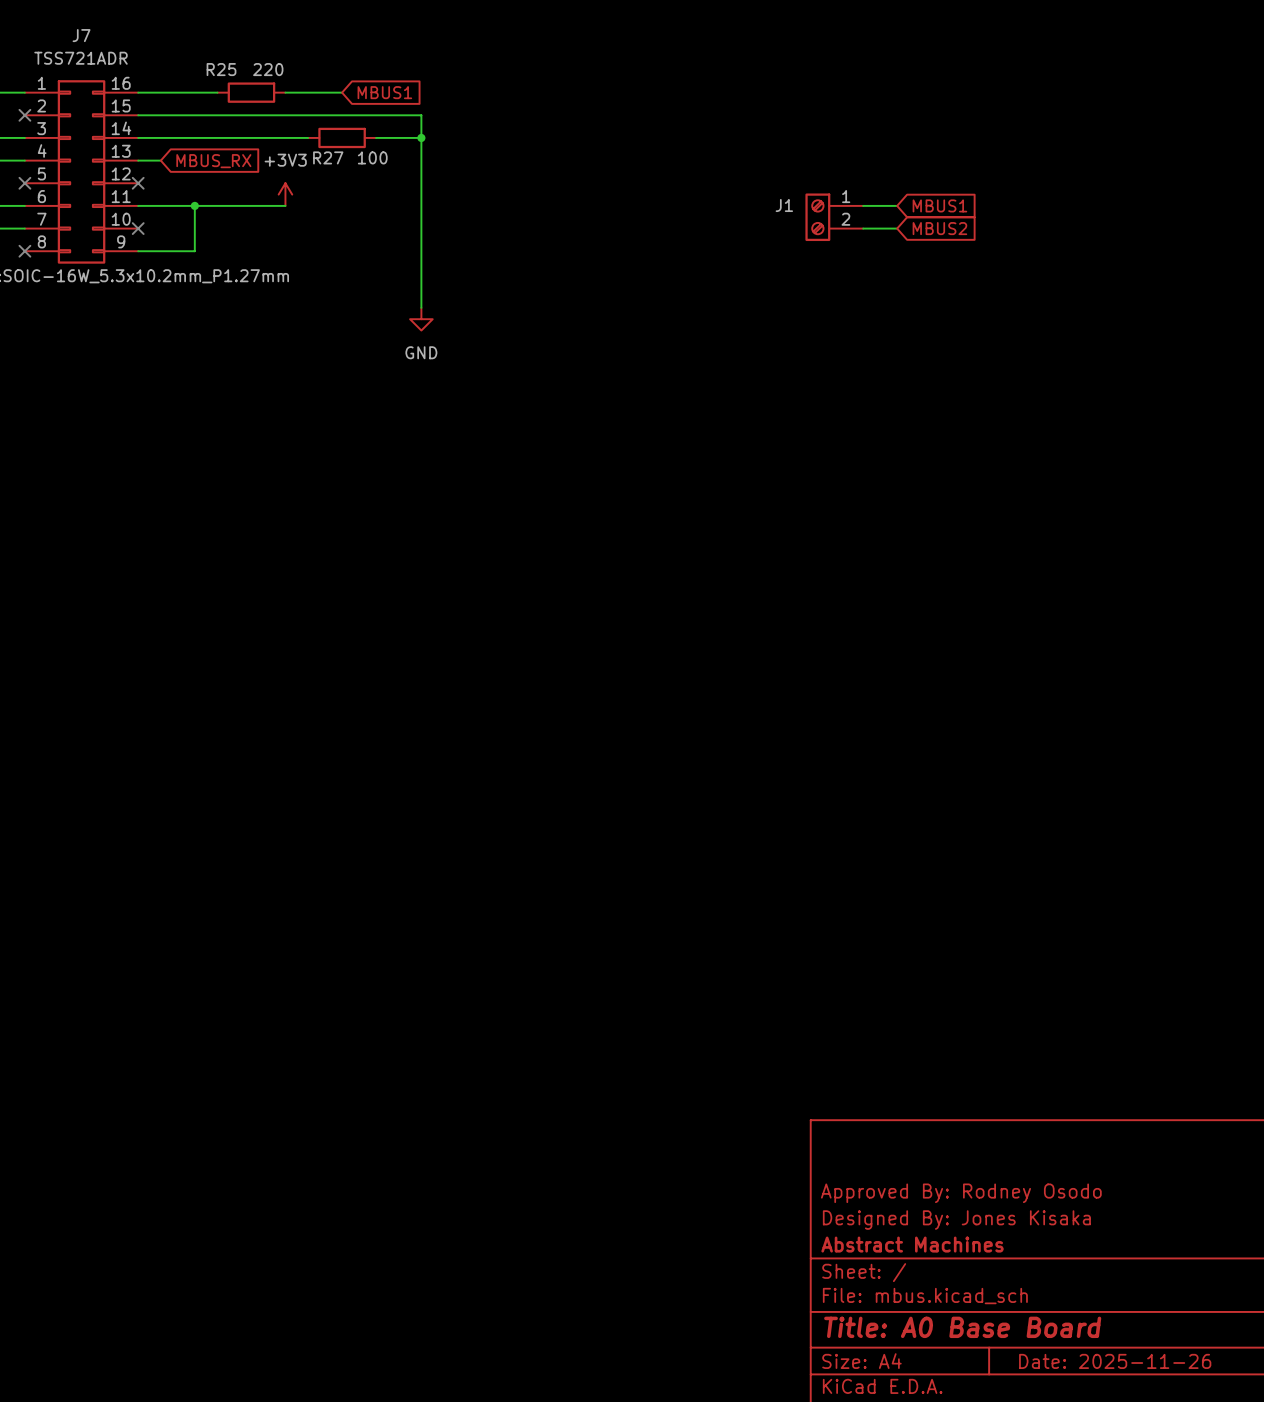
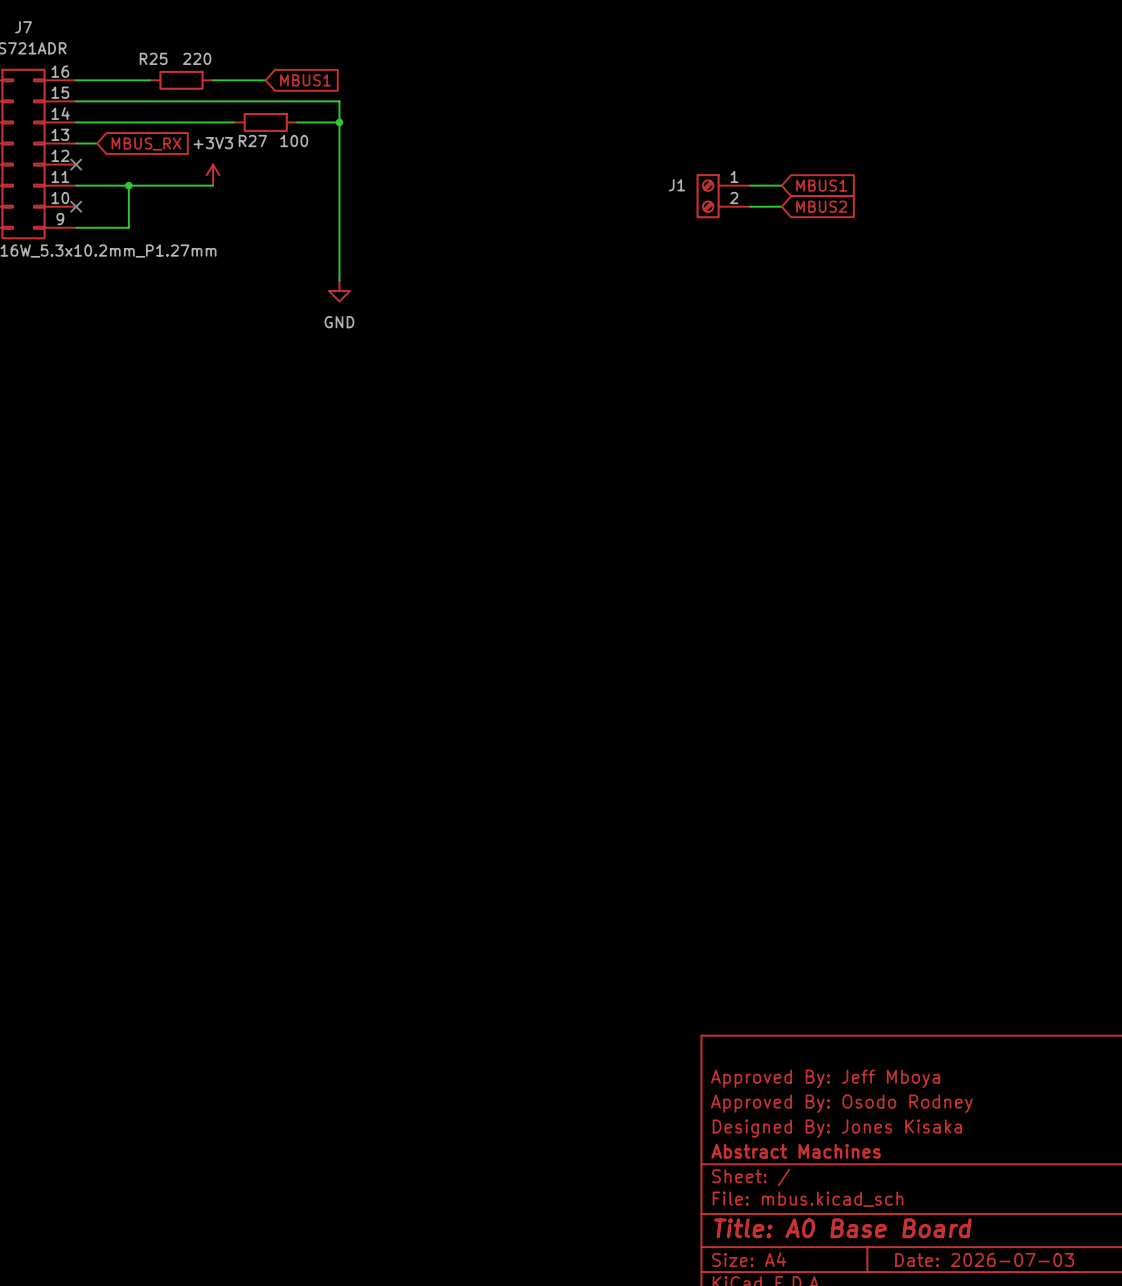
title block: none -> Approved By: Jeff Mboya (825, 1078)
title block: Approved By: Rodney Osodo (961, 1193) -> Approved By: Osodo Rodney (841, 1103)
title block: Date: 2025-11-26 (1115, 1361) -> Date: 2026-07-03 (984, 1259)

